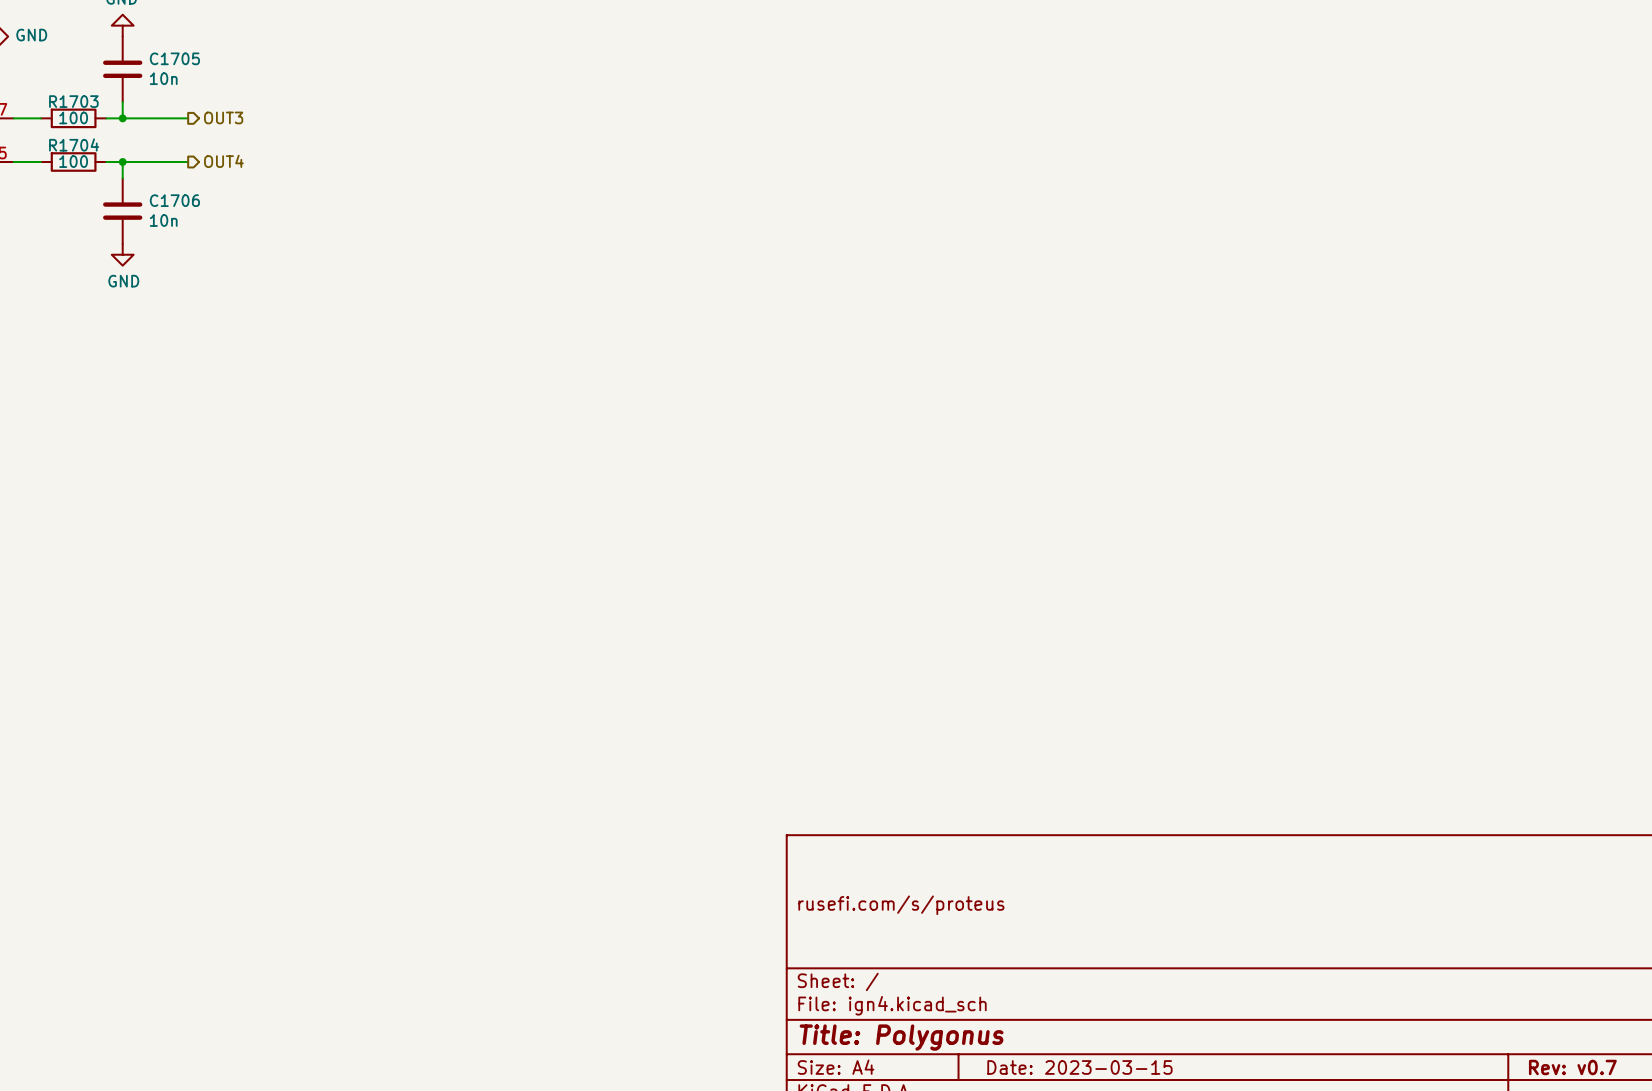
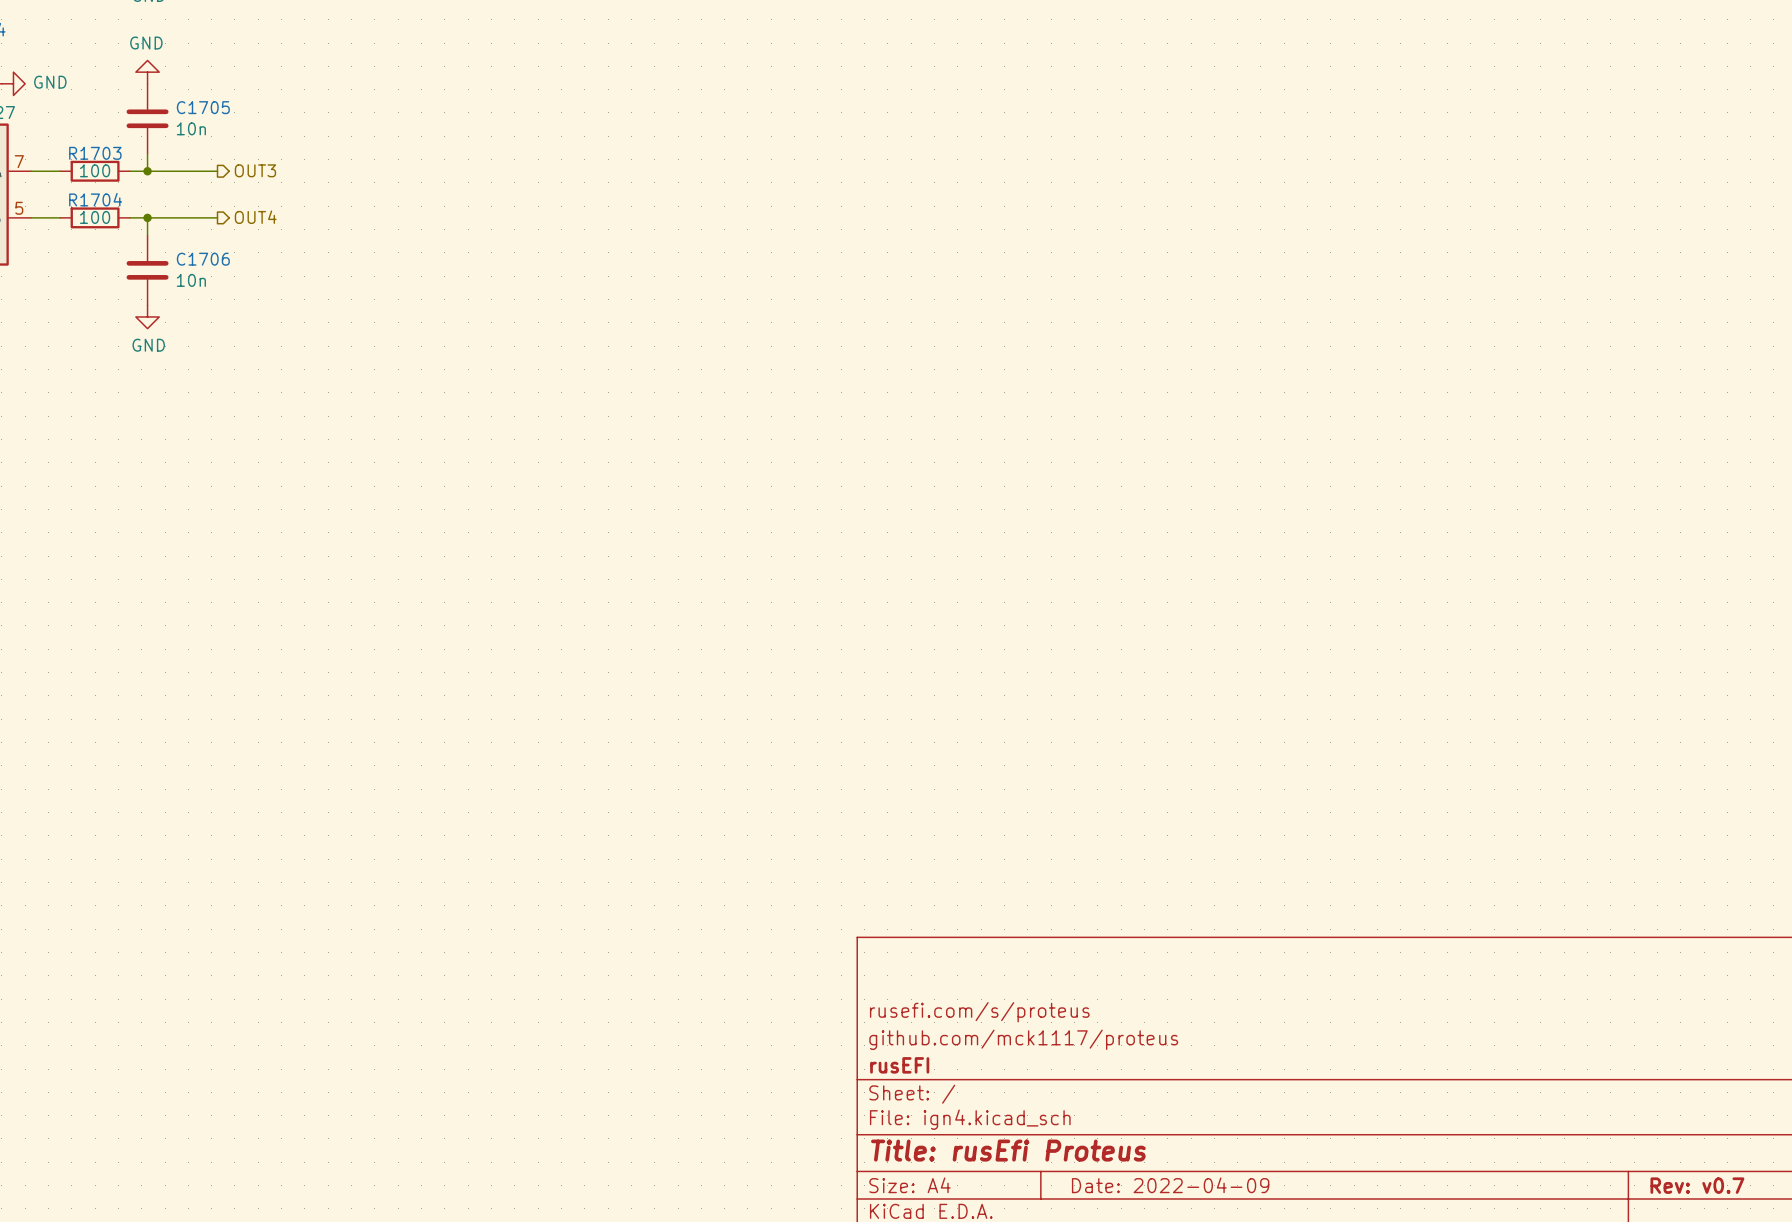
title block: none -> github.com/mck1117/proteus (1023, 1039)
title block: none -> rusEFI (899, 1065)
title block: Title: Polygonus (901, 1037) -> Title: rusEfi Proteus (1008, 1150)
title block: Date: 2023-03-15 (1079, 1067) -> Date: 2022-04-09 (1170, 1185)

